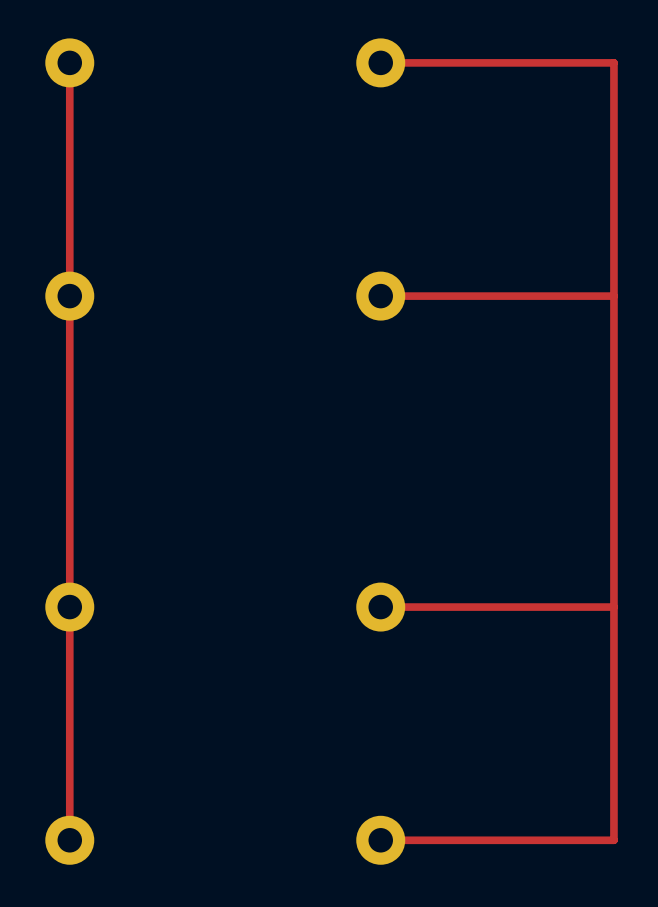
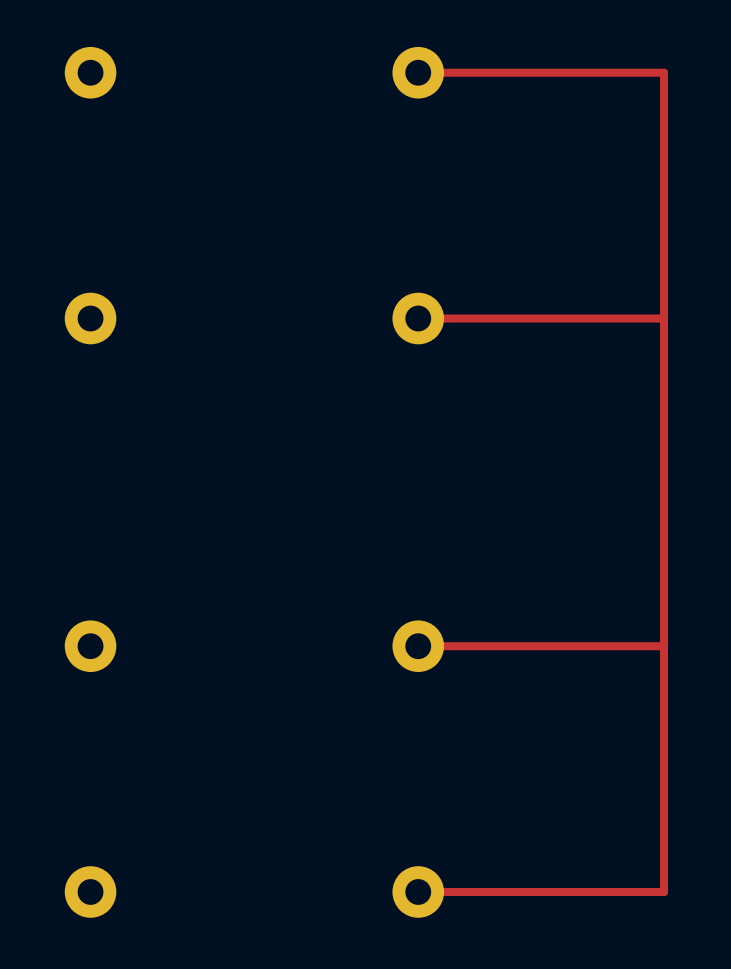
top track: (69, 62) (69, 840) -> none

